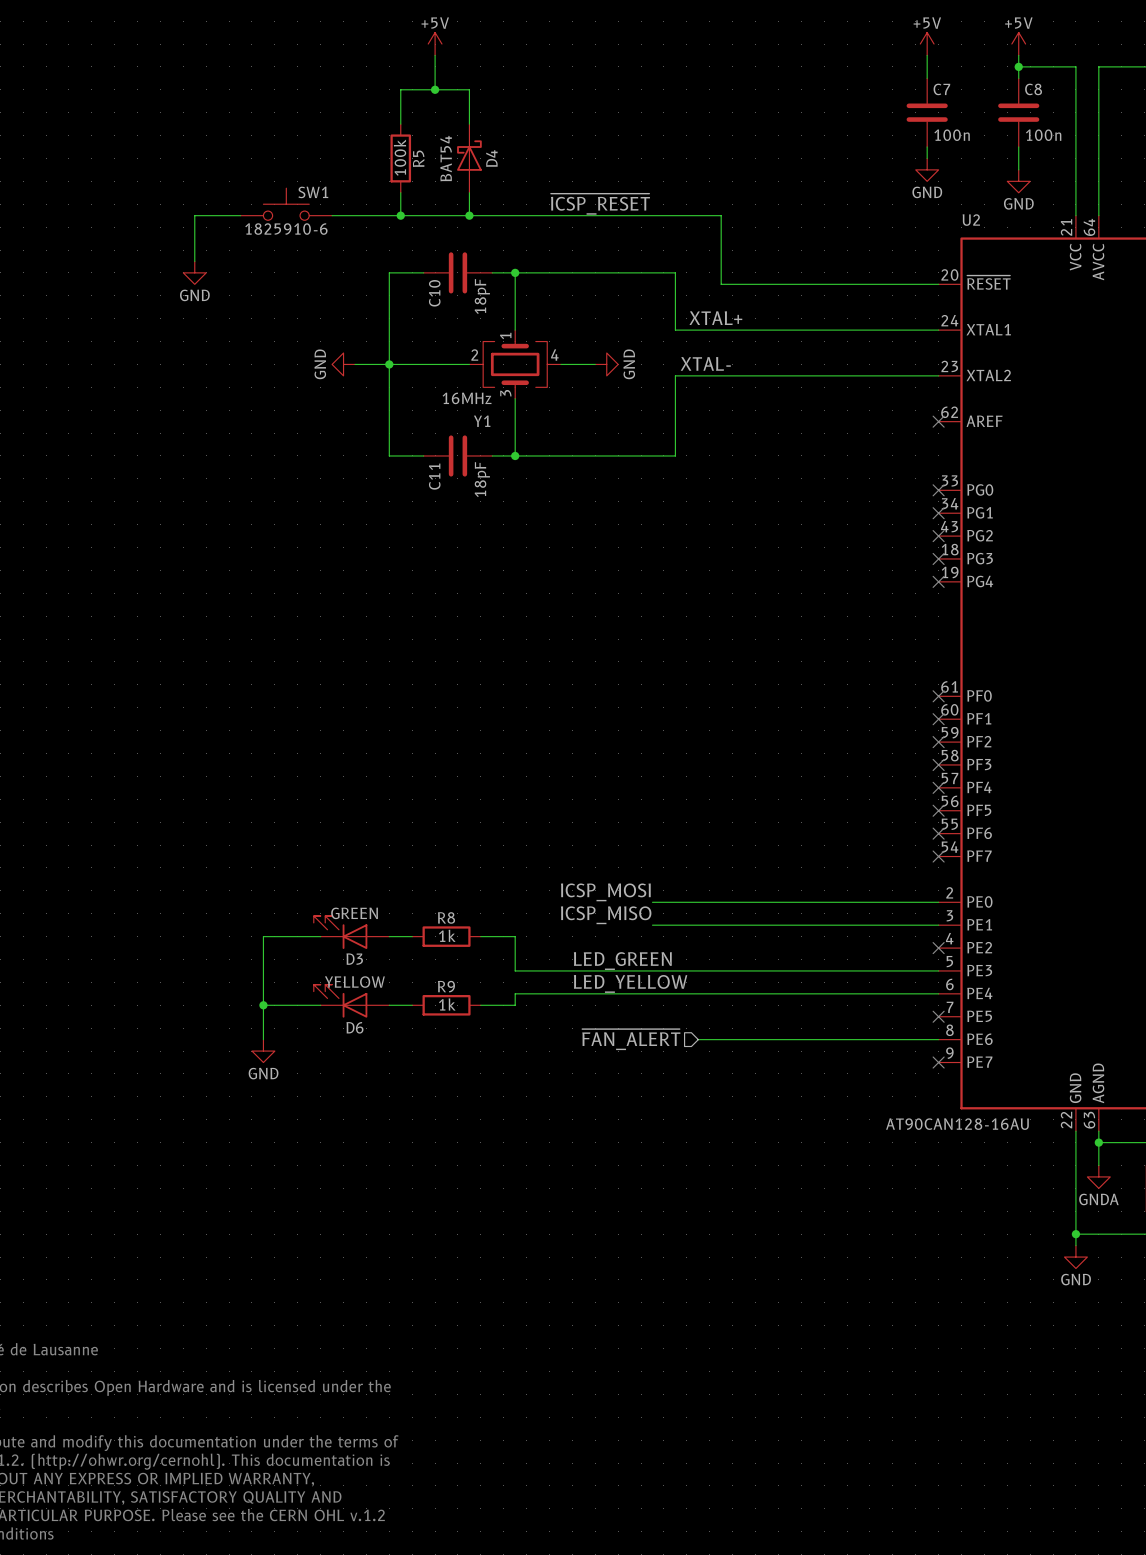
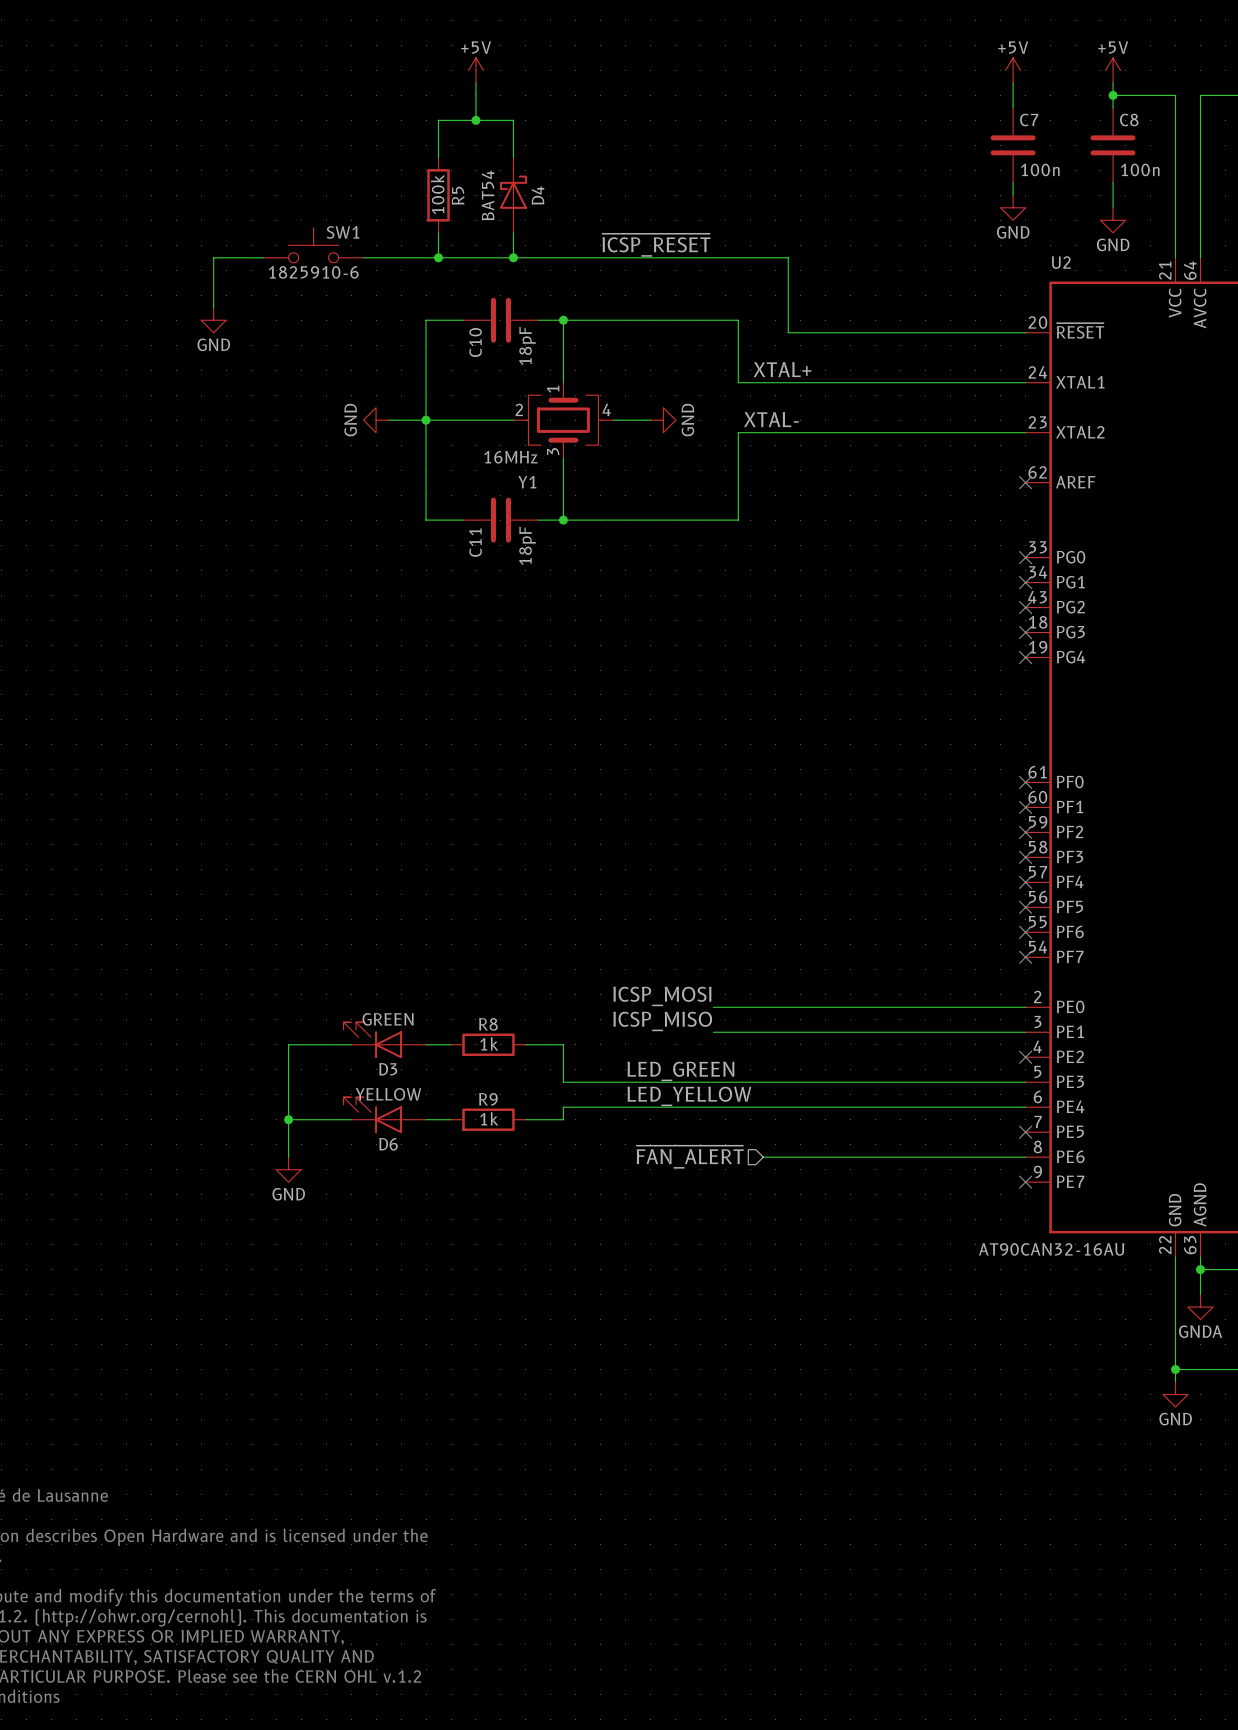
U2 value: AT90CAN128-16AU (957, 1124) -> AT90CAN32-16AU (1051, 1249)

